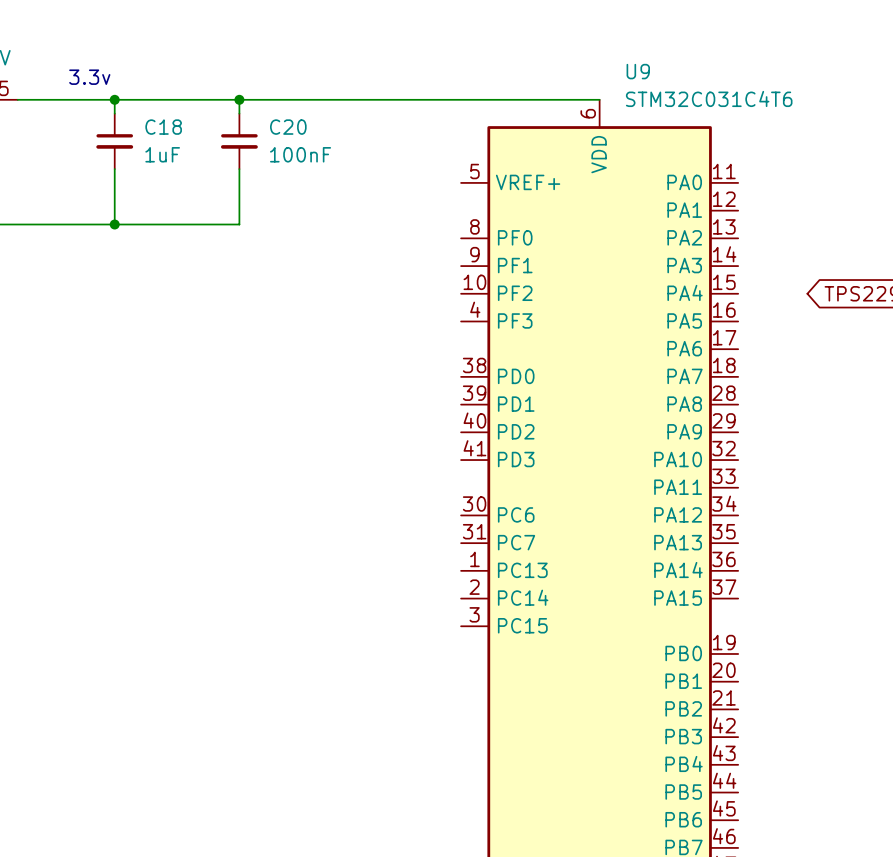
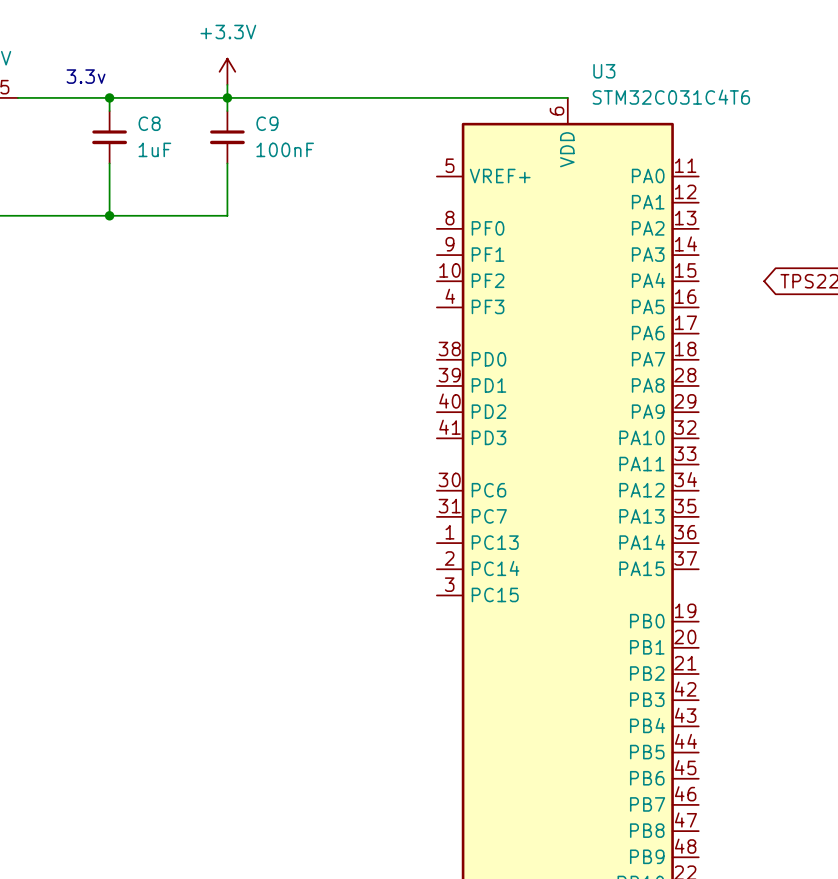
U9 name: U9 (638, 71) -> U3 (604, 71)
power symbol: none -> +3.3V (227, 71)
wire: none -> (227, 84) (227, 97)
C18 name: C18 (163, 127) -> C8 (149, 123)
C20 name: C20 (288, 127) -> C9 (267, 123)

